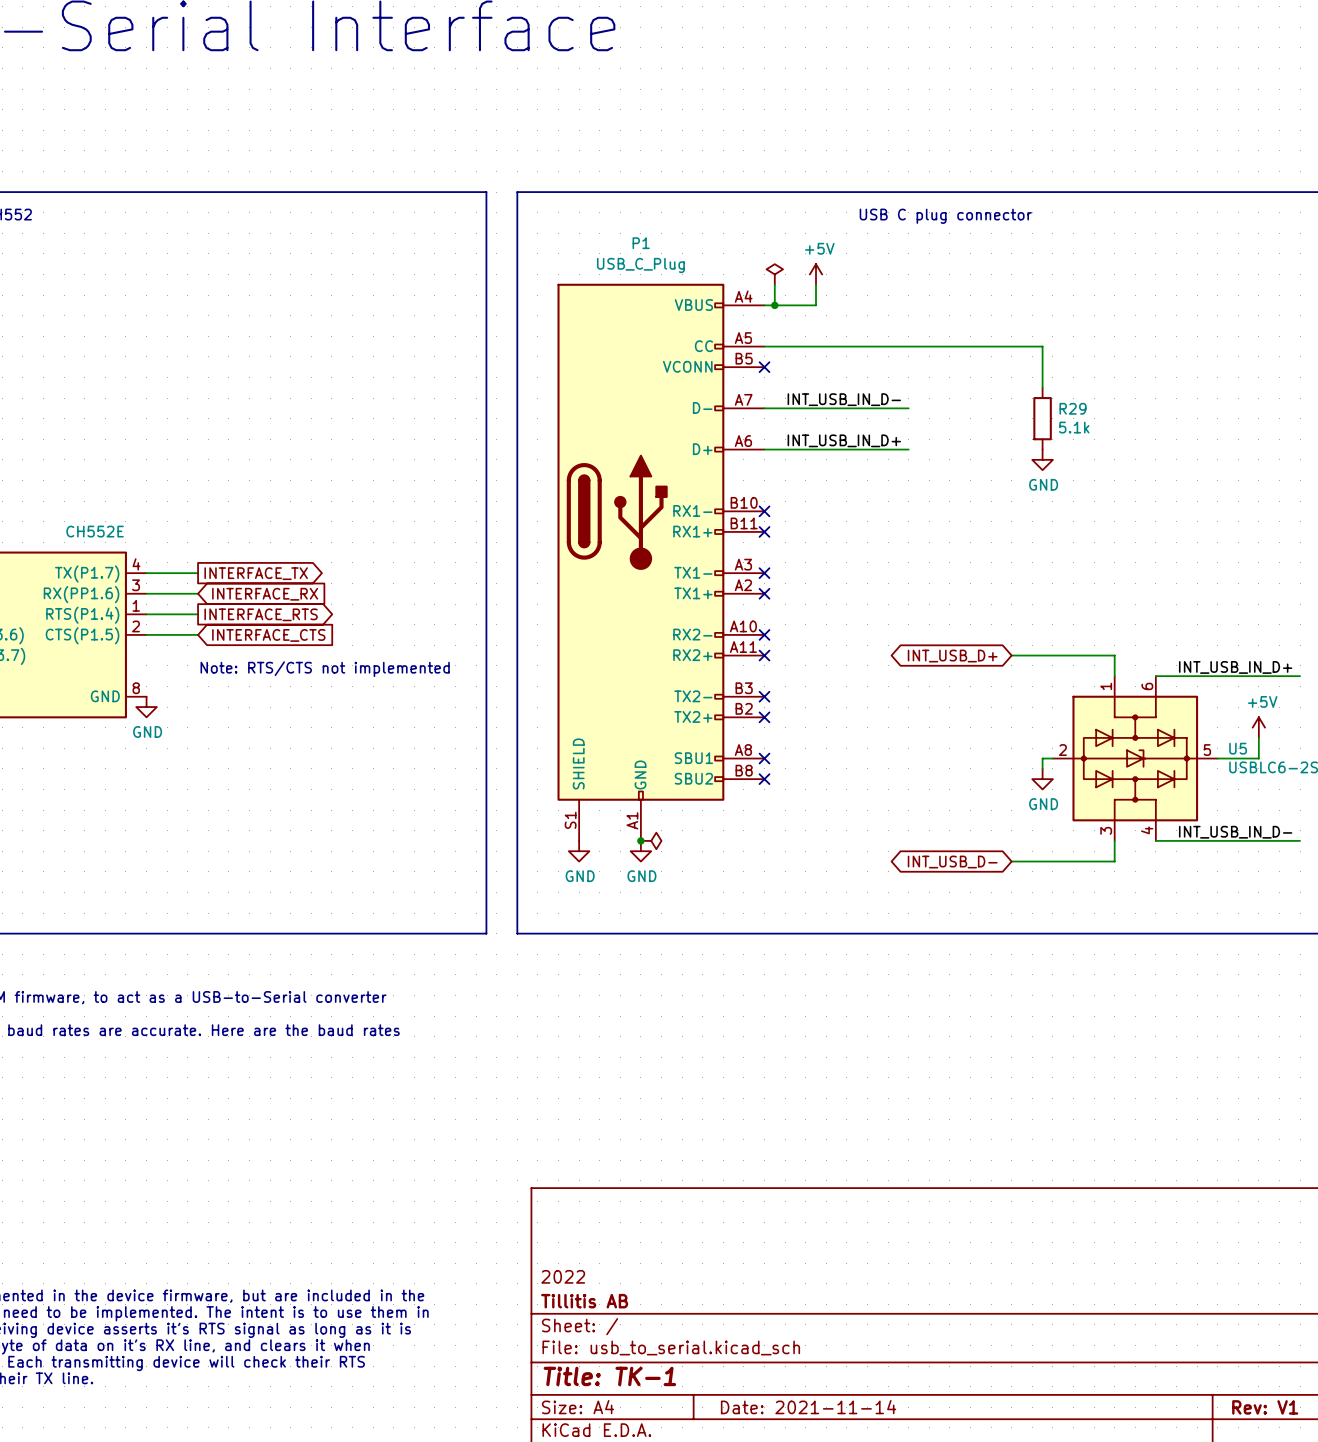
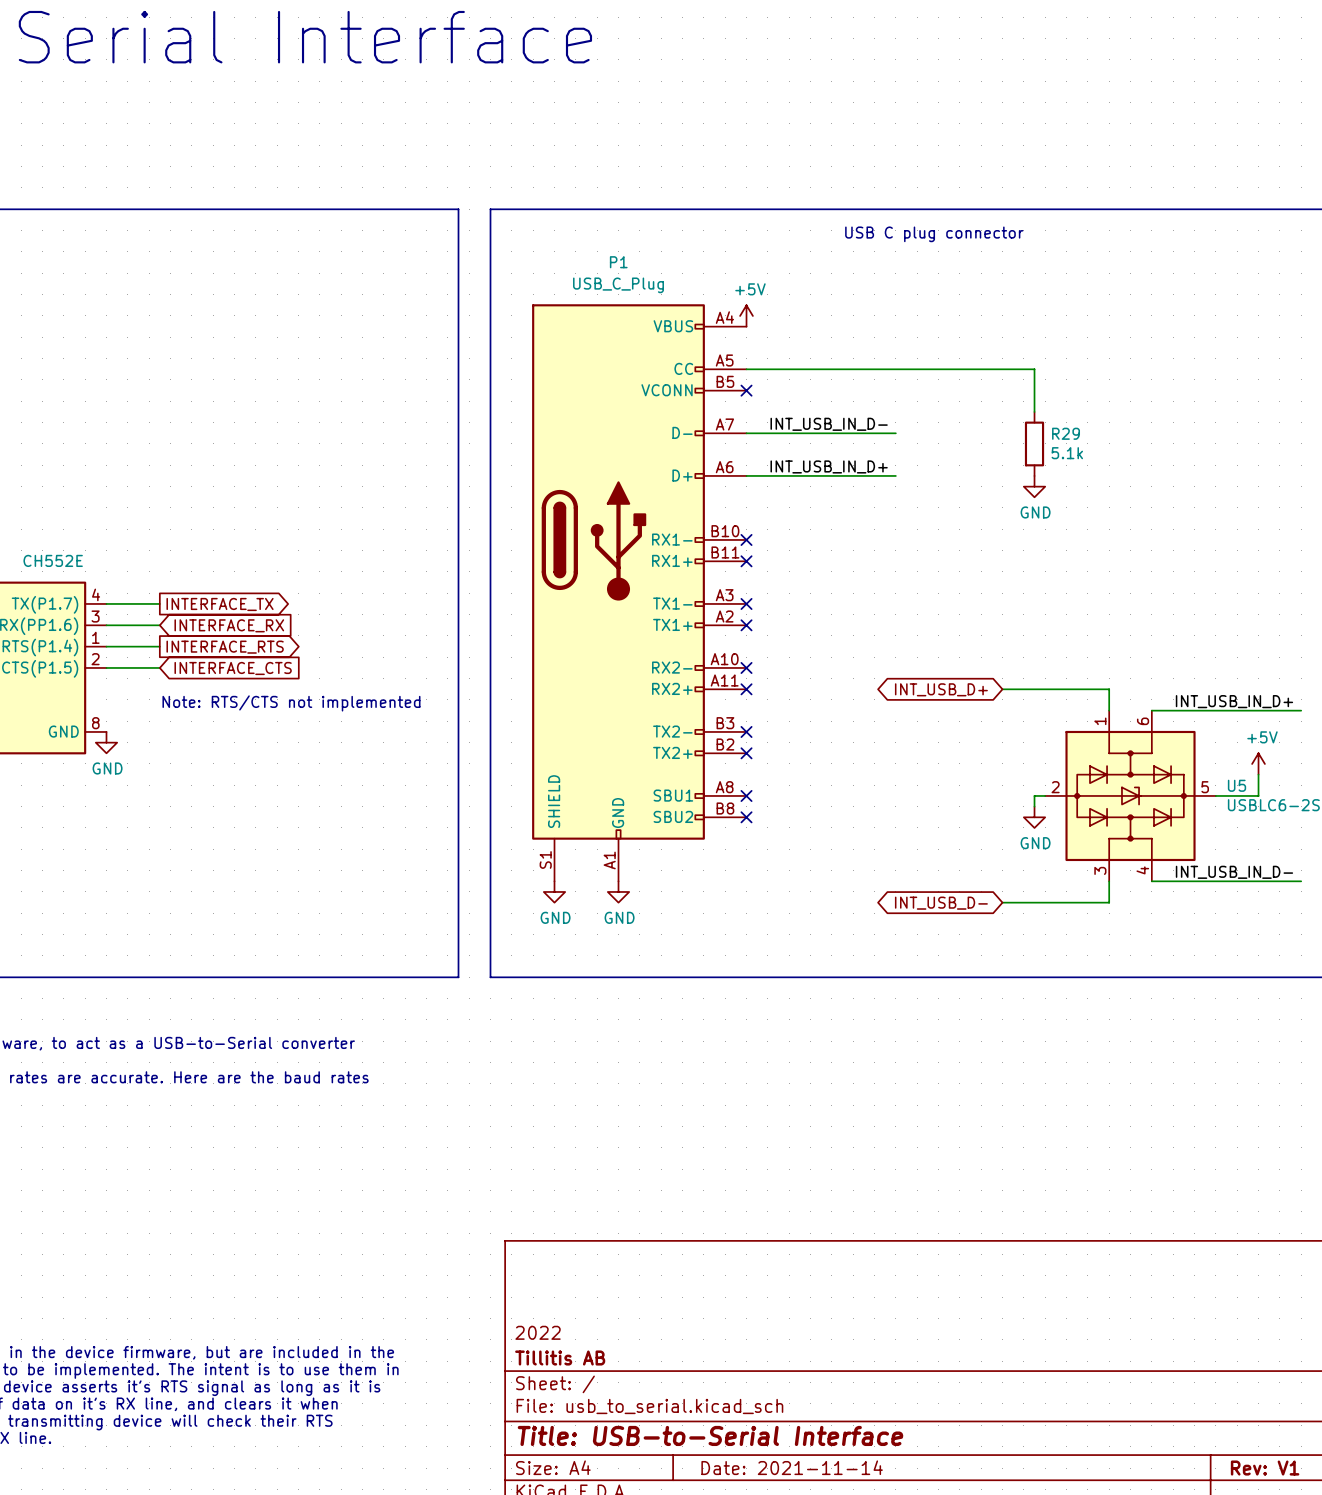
power symbol: (774, 274) -> none
power symbol position: +5V (816, 274) -> +5V (746, 315)
wire: (774, 284) (774, 305) -> none
wire: (816, 284) (816, 305) (764, 305) -> none
junction: (774, 305) -> none
junction: (640, 840) -> none
power symbol: (651, 840) -> none
title block: Title: TK-1 (609, 1376) -> Title: USB-to-Serial Interface (710, 1435)

